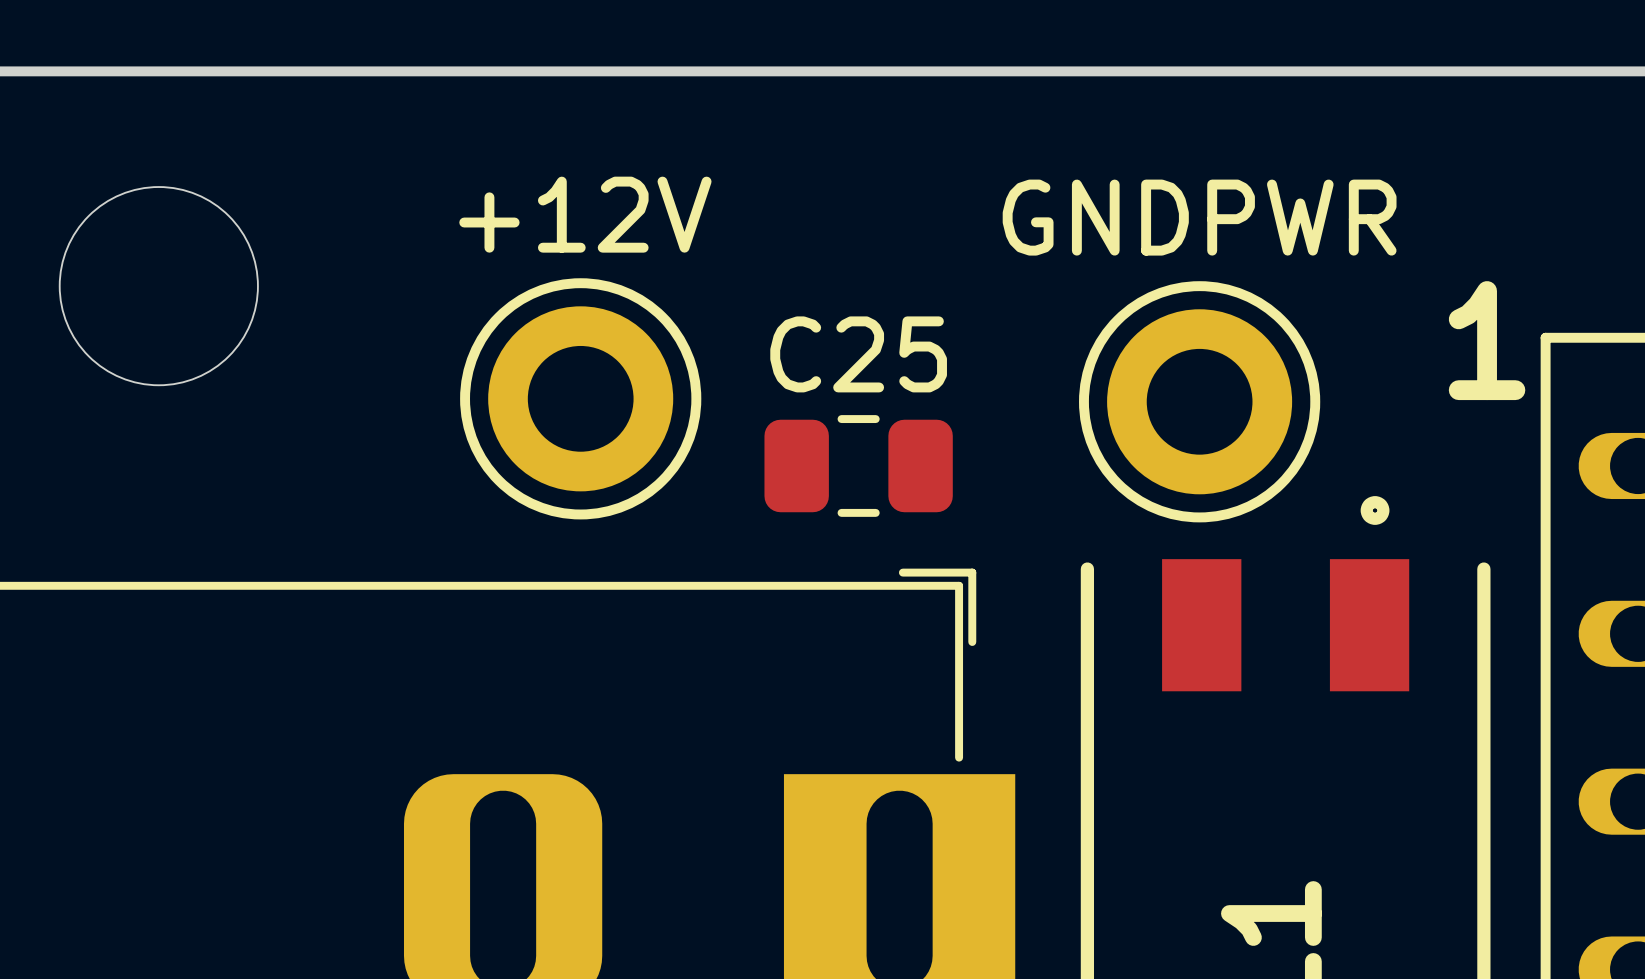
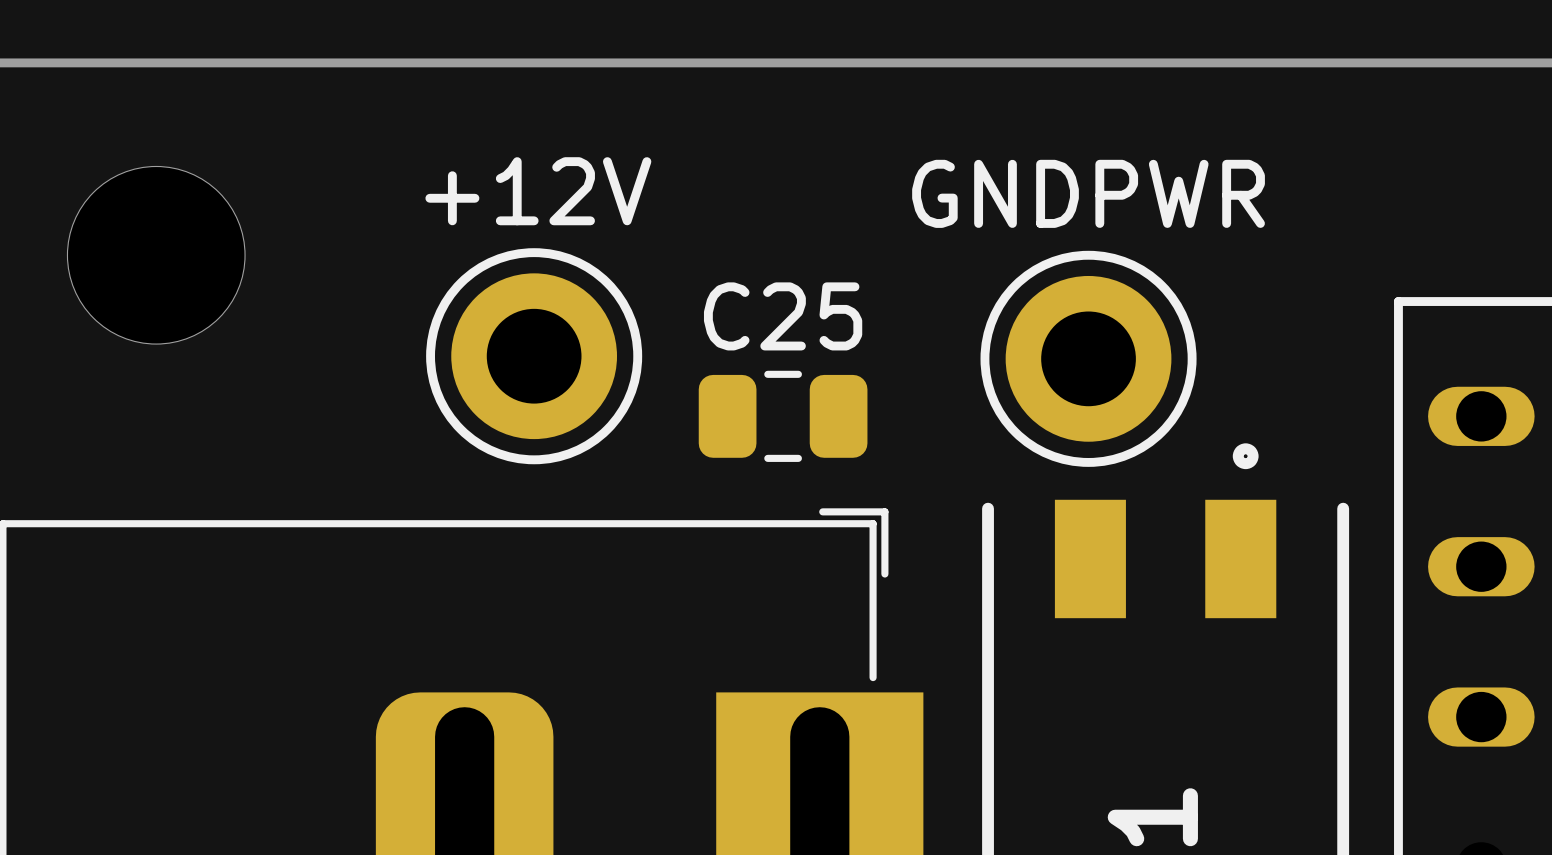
text: 1 (1487, 340) -> none

